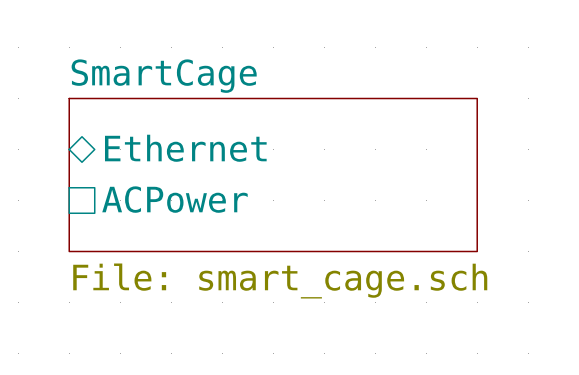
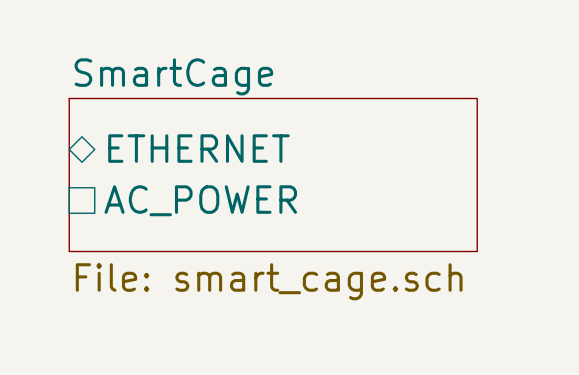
sheet pin: Ethernet (185, 148) -> ETHERNET (198, 148)
sheet pin: ACPower (174, 199) -> AC_POWER (200, 200)

